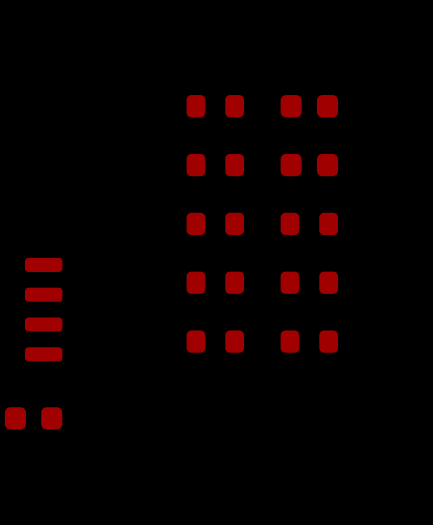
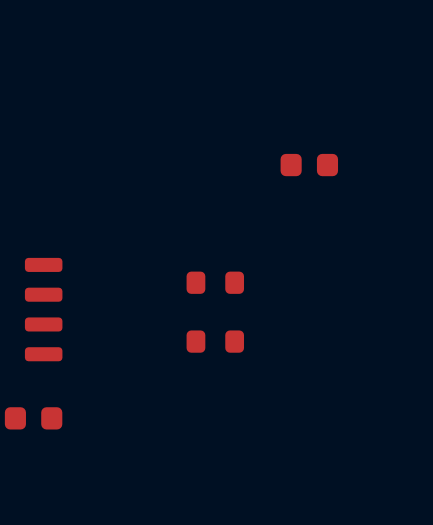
part: (215, 106) -> none
part: (309, 106) -> none
part: (215, 165) -> none
part: (215, 223) -> none
part: (309, 223) -> none
part: (309, 282) -> none
part: (309, 341) -> none

